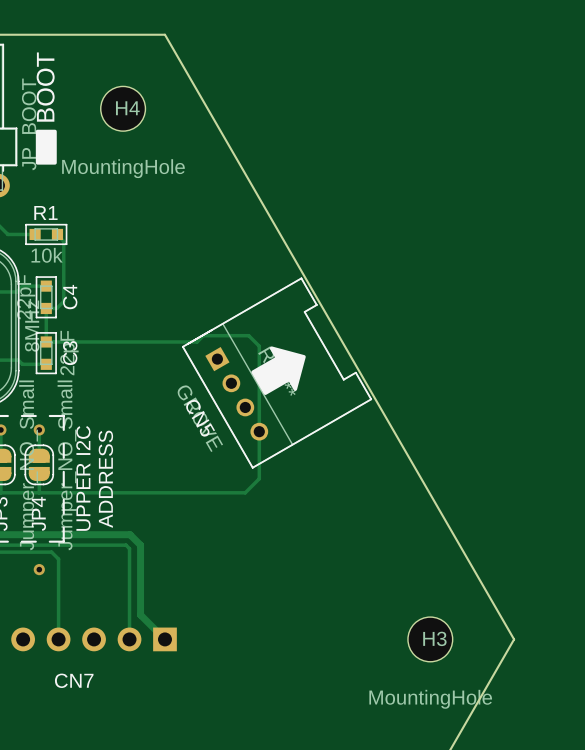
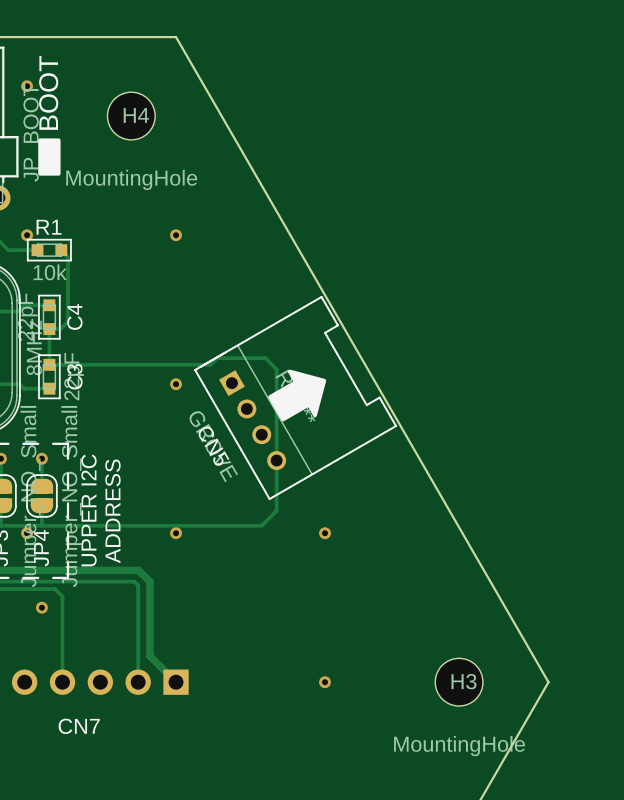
via: none -> (27, 86)
via: none -> (27, 235)
via: none -> (176, 235)
via: none -> (176, 384)
via: none -> (27, 533)
via: none -> (176, 533)
via: none -> (325, 533)
via: none -> (325, 682)

